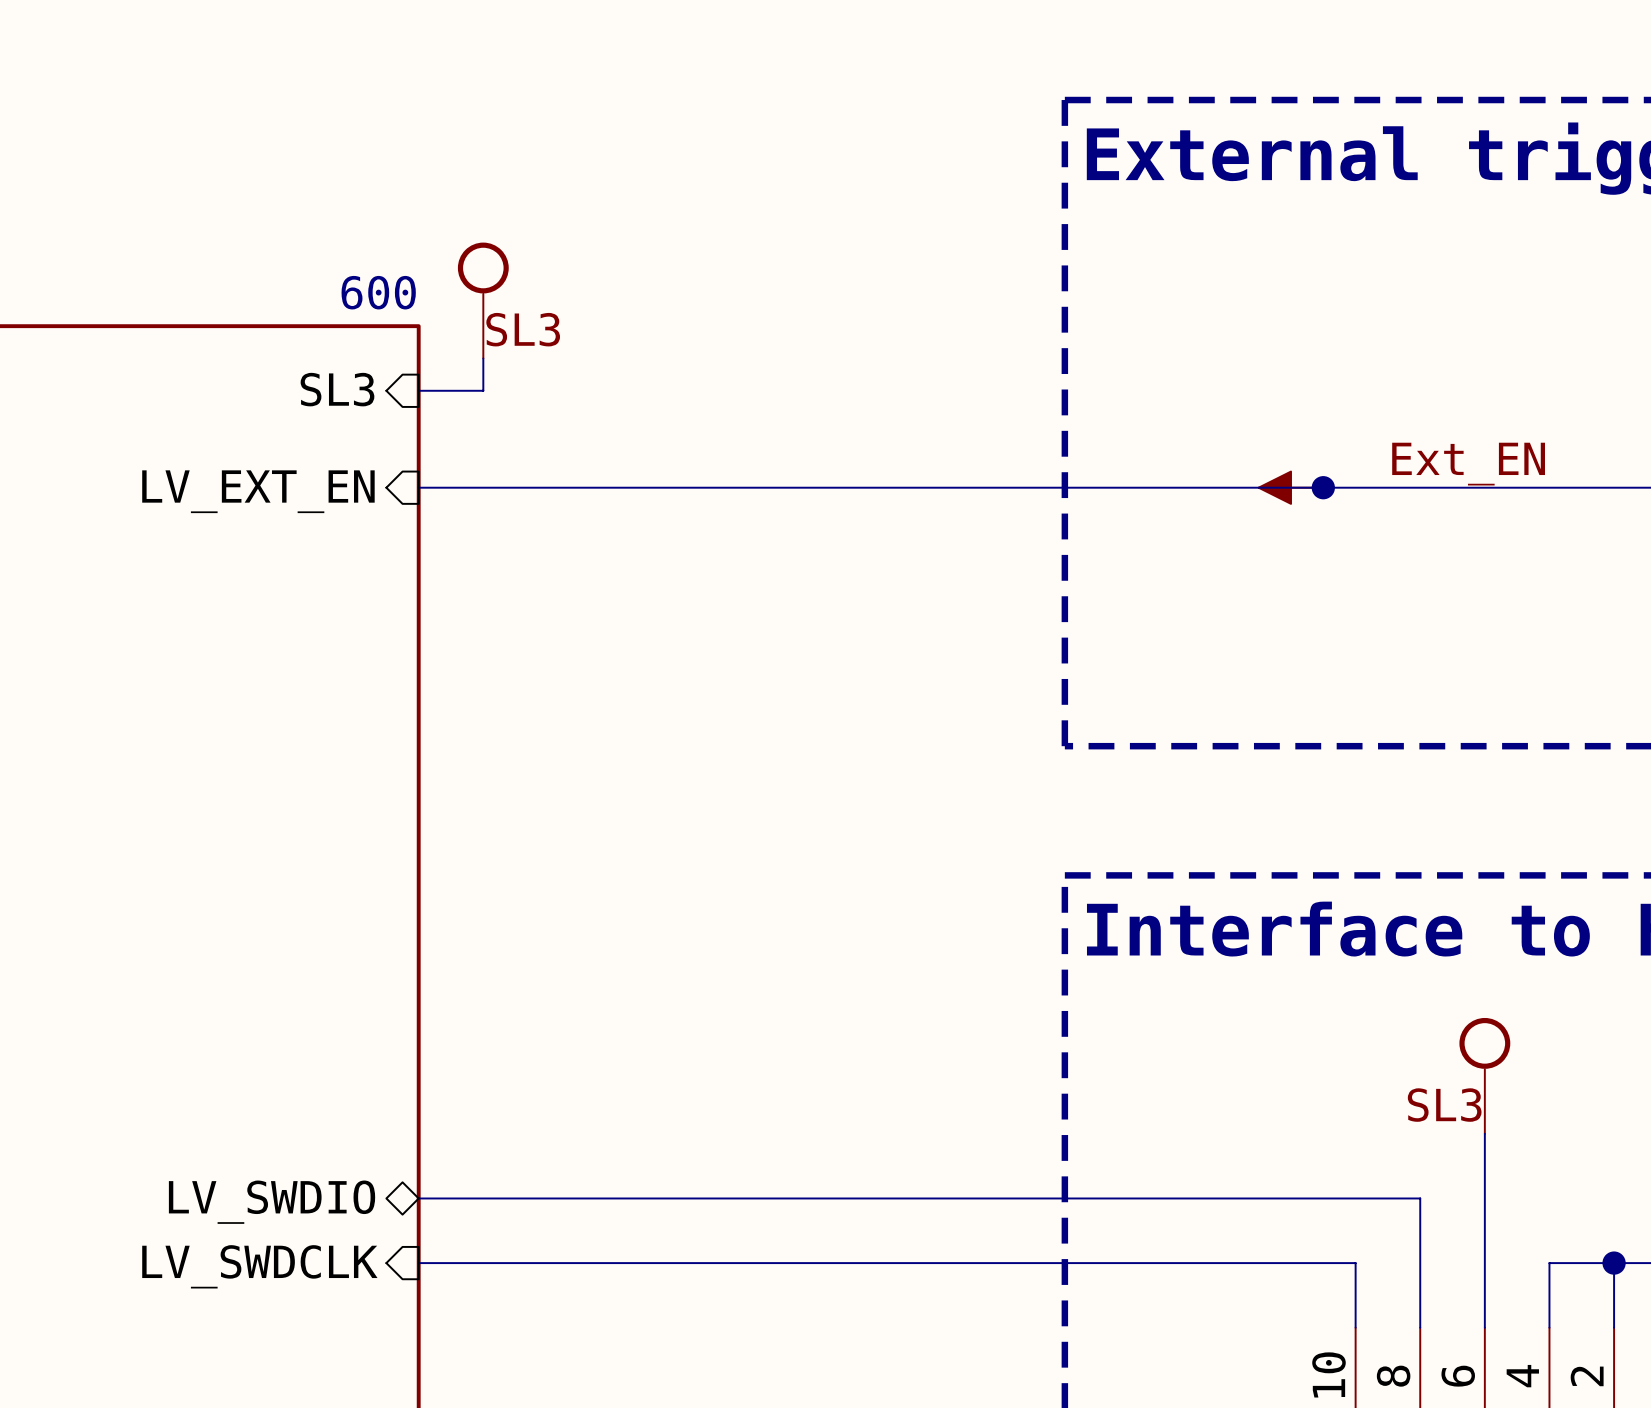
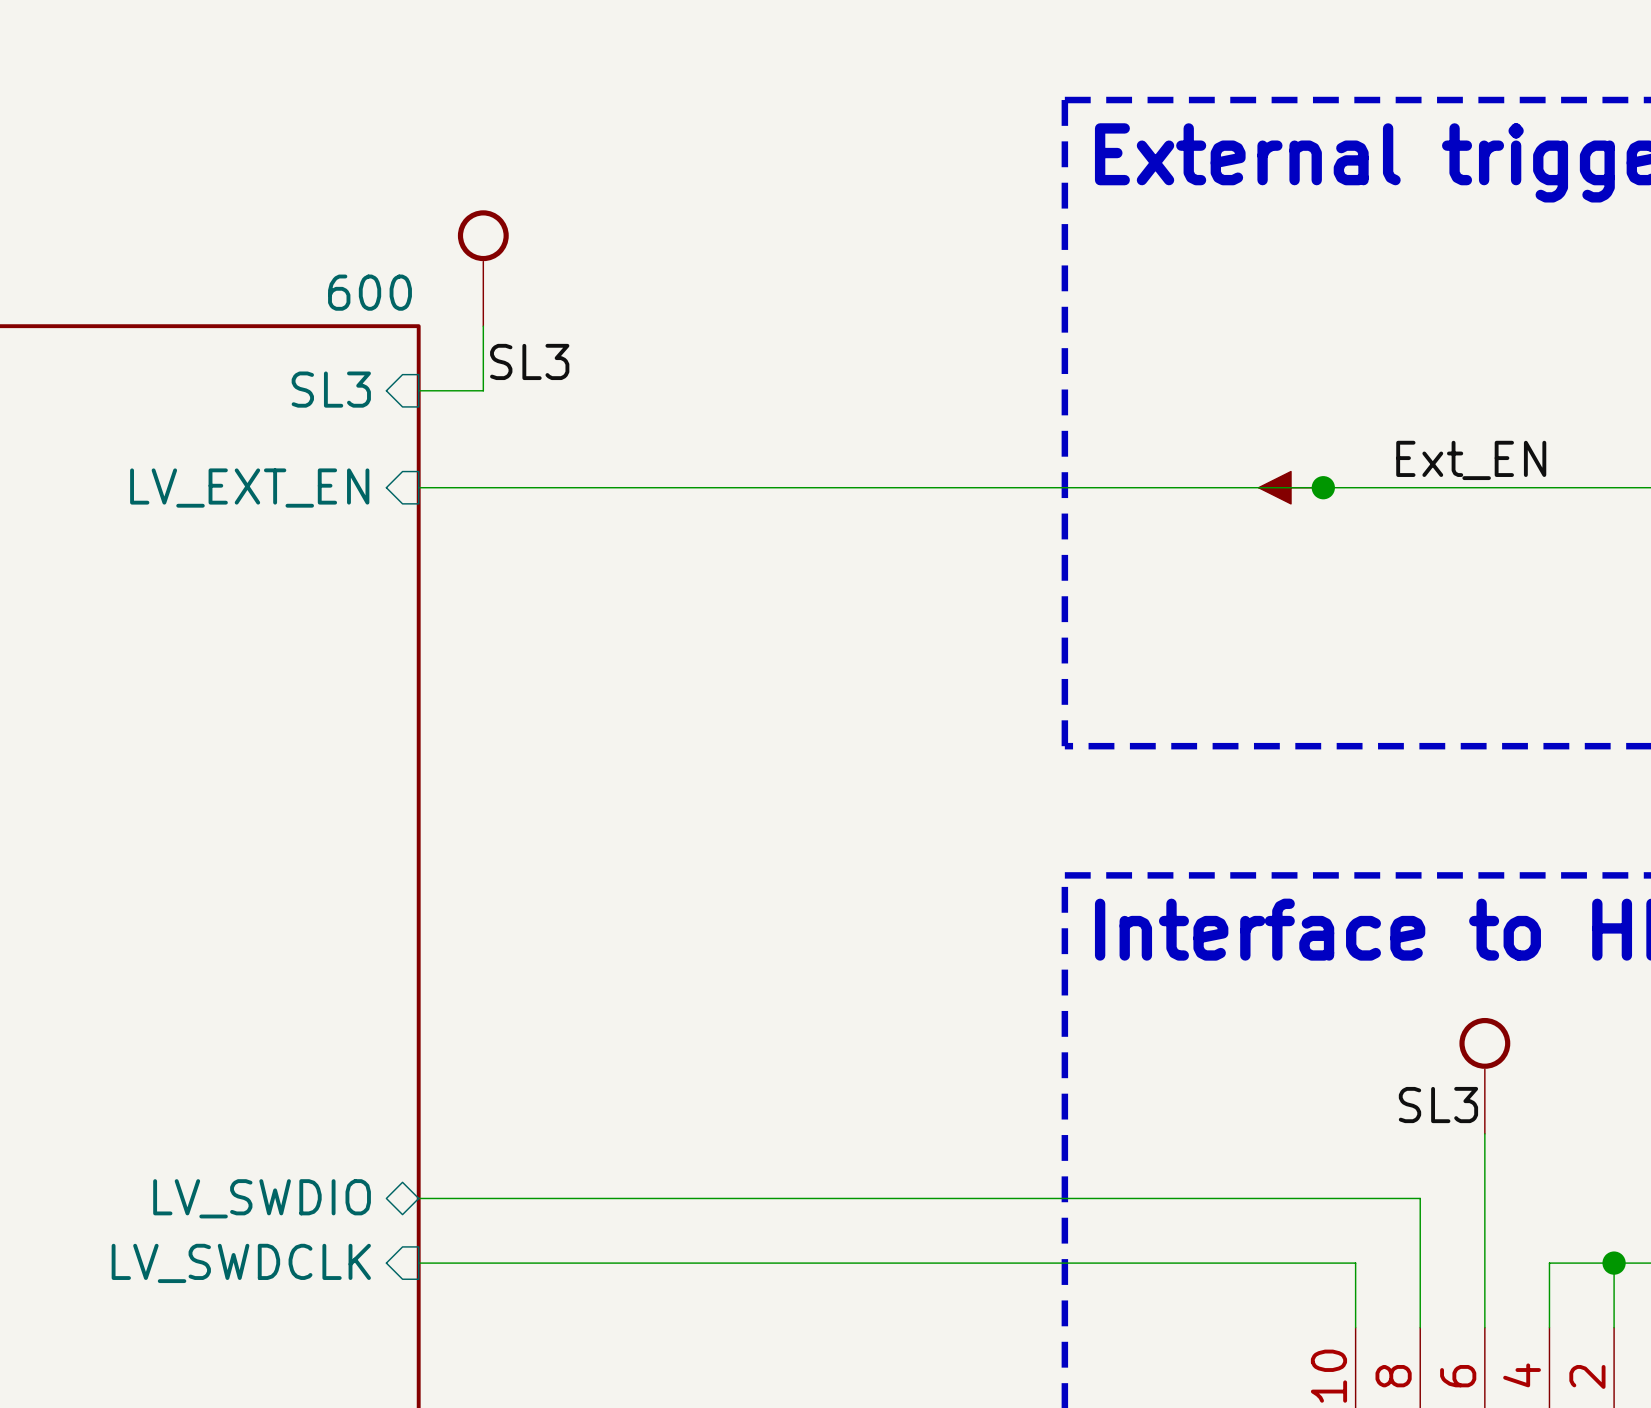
part position: (483, 300) -> (483, 268)
label position: SL3 (523, 329) -> SL3 (529, 361)

